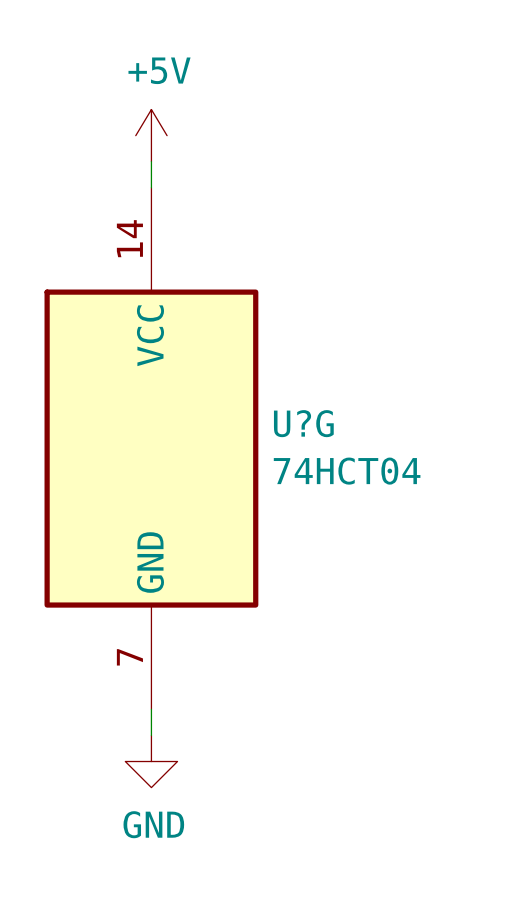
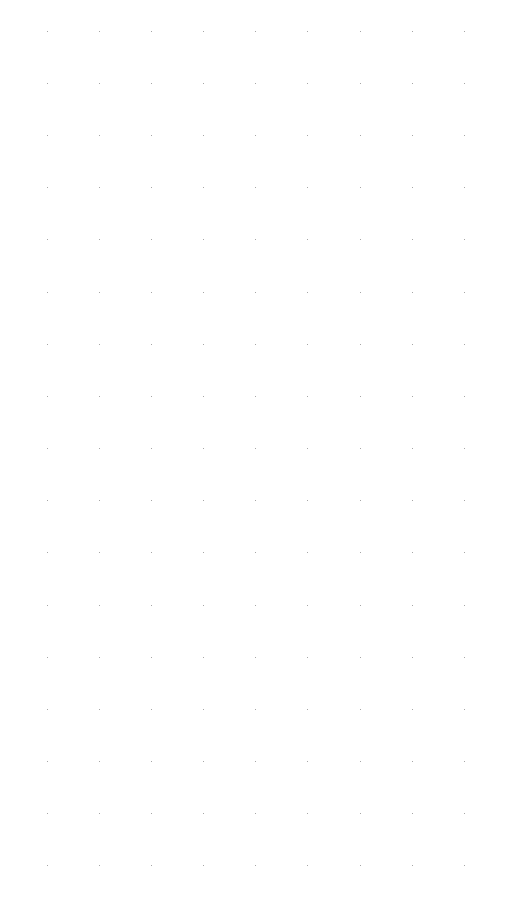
power symbol: +5V (151, 135) -> none
wire: (151, 161) (151, 187) -> none
U?G: 74HCT04 (151, 448) -> none
wire: (151, 709) (151, 735) -> none
power symbol: GND (151, 761) -> none

